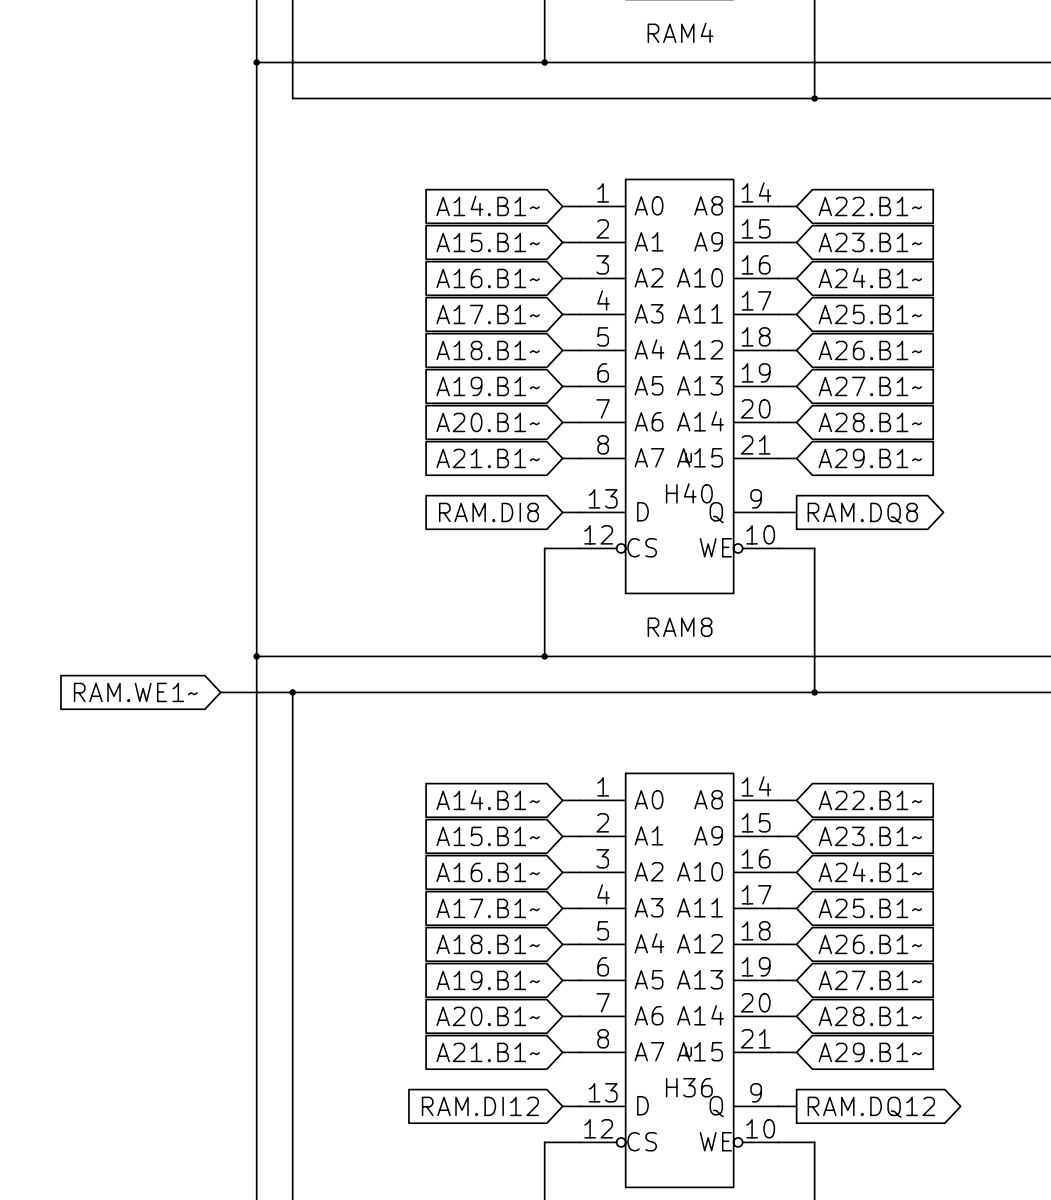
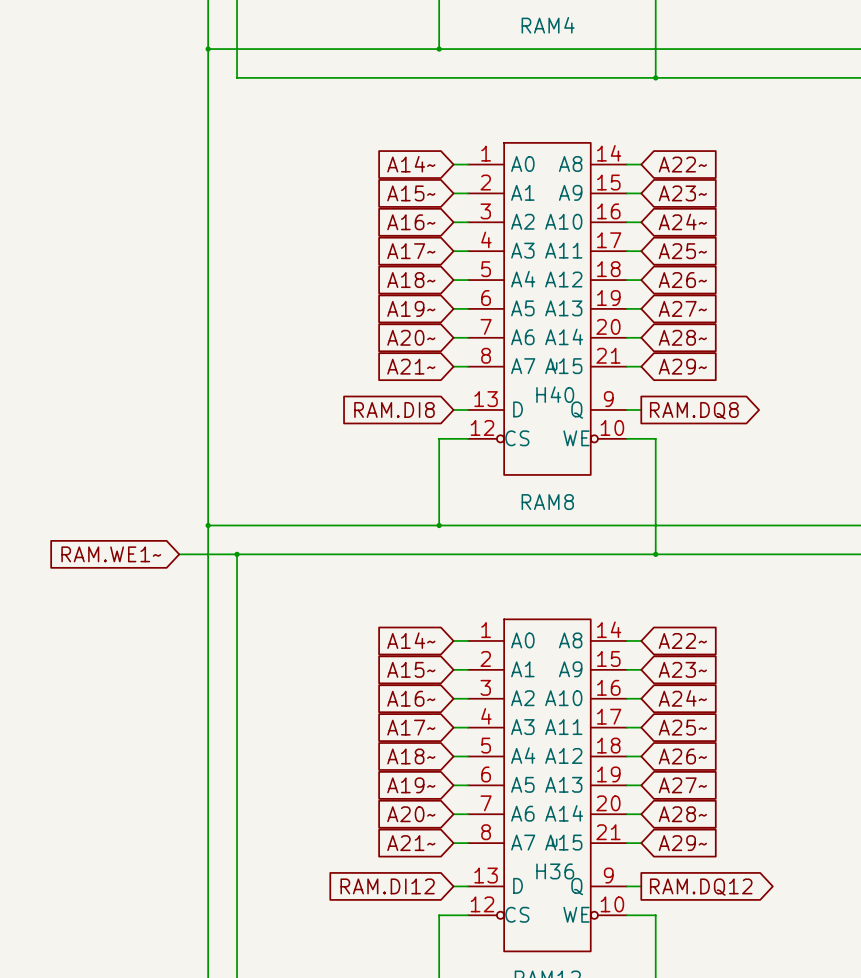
global label: A14.B1~ (488, 206) -> A14~ (411, 164)
global label: A22.B1~ (870, 206) -> A22~ (682, 164)
global label: A15.B1~ (488, 242) -> A15~ (411, 193)
global label: A23.B1~ (870, 242) -> A23~ (682, 193)
global label: A16.B1~ (488, 278) -> A16~ (411, 222)
global label: A24.B1~ (870, 278) -> A24~ (682, 221)
global label: A17.B1~ (488, 314) -> A17~ (411, 251)
global label: A25.B1~ (870, 314) -> A25~ (682, 251)
global label: A18.B1~ (488, 350) -> A18~ (411, 280)
global label: A26.B1~ (870, 350) -> A26~ (682, 280)
global label: A19.B1~ (488, 386) -> A19~ (411, 308)
global label: A27.B1~ (870, 386) -> A27~ (682, 308)
global label: A20.B1~ (488, 422) -> A20~ (411, 337)
global label: A28.B1~ (870, 422) -> A28~ (682, 337)
global label: A21.B1~ (488, 458) -> A21~ (411, 366)
global label: A29.B1~ (870, 458) -> A29~ (682, 366)
global label: A14.B1~ (488, 800) -> A14~ (411, 640)
global label: A22.B1~ (870, 800) -> A22~ (682, 640)
global label: A15.B1~ (488, 836) -> A15~ (411, 669)
global label: A23.B1~ (870, 836) -> A23~ (682, 669)
global label: A24.B1~ (870, 871) -> A24~ (682, 698)
global label: A16.B1~ (488, 872) -> A16~ (411, 698)
global label: A17.B1~ (488, 908) -> A17~ (411, 727)
global label: A25.B1~ (870, 908) -> A25~ (682, 727)
global label: A18.B1~ (488, 944) -> A18~ (411, 756)
global label: A26.B1~ (870, 944) -> A26~ (682, 756)
global label: A19.B1~ (488, 980) -> A19~ (411, 785)
global label: A27.B1~ (870, 980) -> A27~ (682, 785)
global label: A20.B1~ (488, 1016) -> A20~ (411, 814)
global label: A28.B1~ (870, 1016) -> A28~ (682, 814)
global label: A21.B1~ (488, 1052) -> A21~ (411, 843)
global label: A29.B1~ (870, 1052) -> A29~ (682, 843)

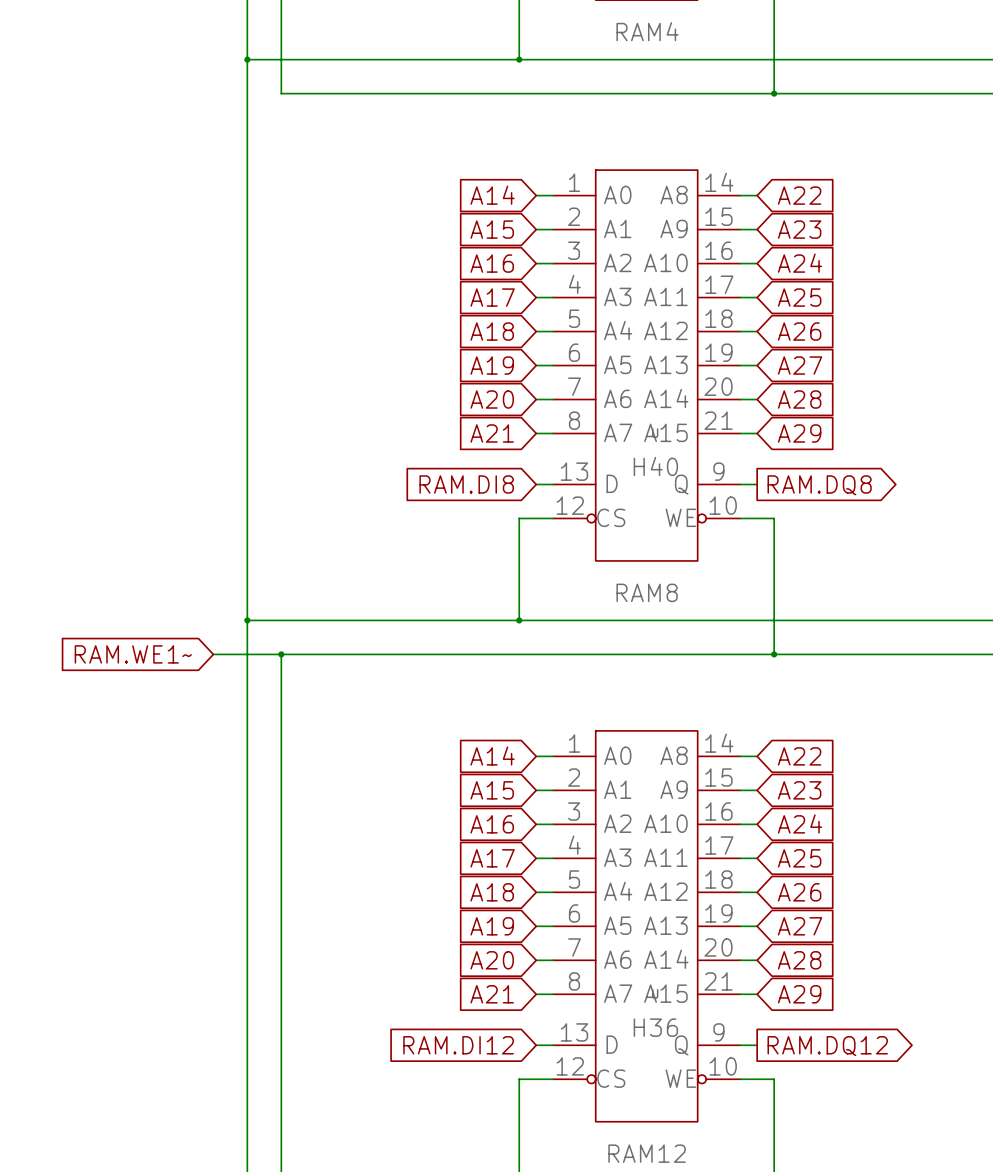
global label: A14~ (411, 164) -> A14 (492, 195)
global label: A22~ (682, 164) -> A22 (799, 195)
global label: A15~ (411, 193) -> A15 (492, 229)
global label: A23~ (682, 193) -> A23 (799, 229)
global label: A24~ (682, 221) -> A24 (800, 263)
global label: A16~ (411, 222) -> A16 (492, 263)
global label: A17~ (411, 251) -> A17 (492, 297)
global label: A25~ (682, 251) -> A25 (799, 297)
global label: A18~ (411, 280) -> A18 (492, 331)
global label: A26~ (682, 280) -> A26 (799, 331)
global label: A19~ (411, 308) -> A19 (492, 365)
global label: A27~ (682, 308) -> A27 (800, 365)
global label: A20~ (411, 337) -> A20 (492, 399)
global label: A28~ (682, 337) -> A28 (799, 399)
global label: A21~ (411, 366) -> A21 (492, 433)
global label: A29~ (682, 366) -> A29 (799, 433)
global label: A14~ (411, 640) -> A14 (492, 755)
global label: A22~ (682, 640) -> A22 (799, 756)
global label: A15~ (411, 669) -> A15 (492, 790)
global label: A23~ (682, 669) -> A23 (799, 790)
global label: A16~ (411, 698) -> A16 (492, 824)
global label: A24~ (682, 698) -> A24 (800, 823)
global label: A17~ (411, 727) -> A17 (492, 858)
global label: A25~ (682, 727) -> A25 (799, 858)
global label: A18~ (411, 756) -> A18 (492, 892)
global label: A26~ (682, 756) -> A26 (799, 892)
global label: A19~ (411, 785) -> A19 (492, 926)
global label: A27~ (682, 785) -> A27 (800, 926)
global label: A20~ (411, 814) -> A20 (492, 960)
global label: A28~ (682, 814) -> A28 (799, 960)
global label: A21~ (411, 843) -> A21 (492, 994)
global label: A29~ (682, 843) -> A29 (799, 994)

